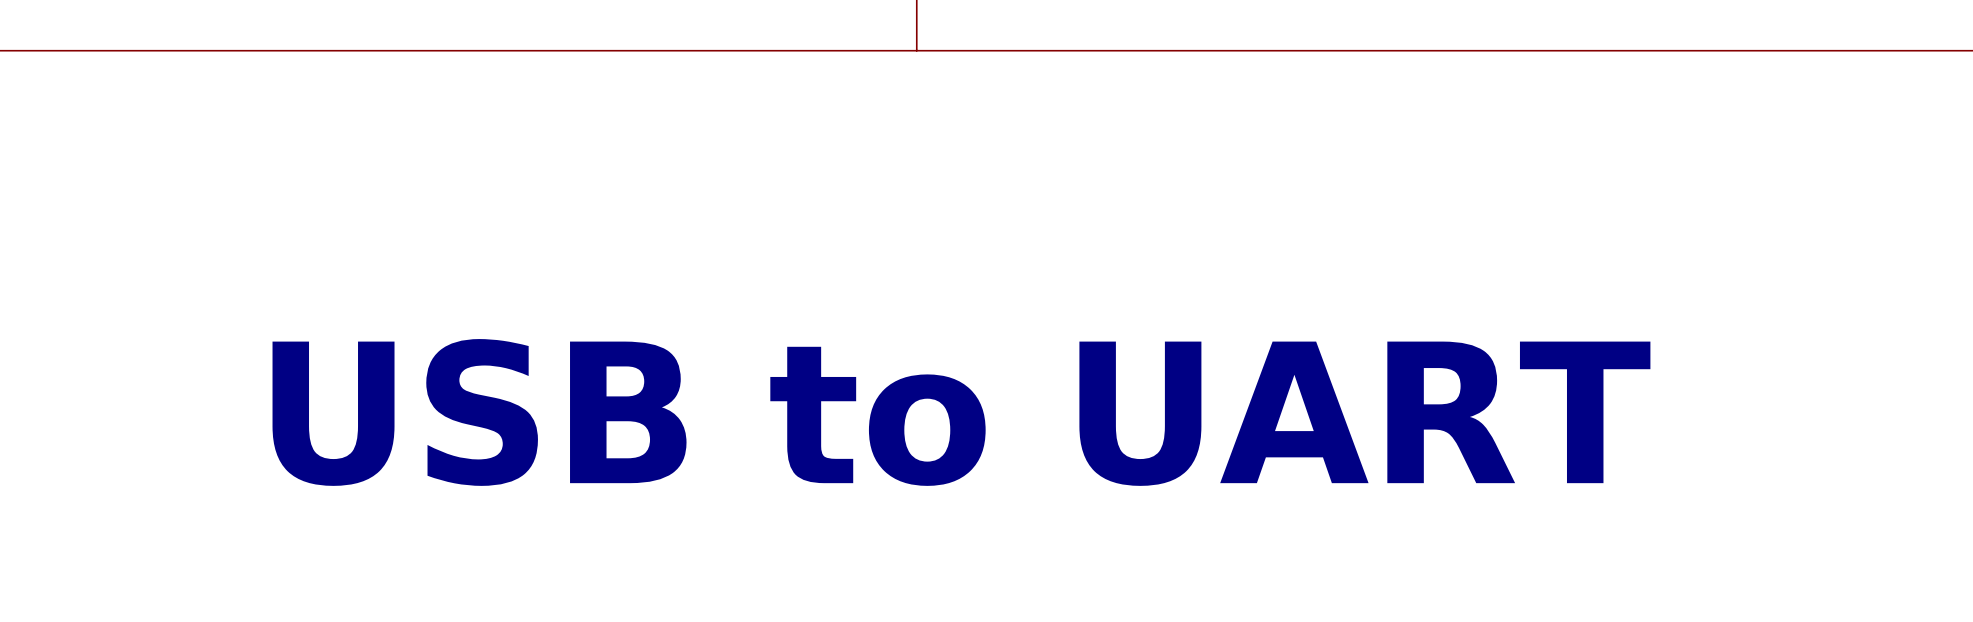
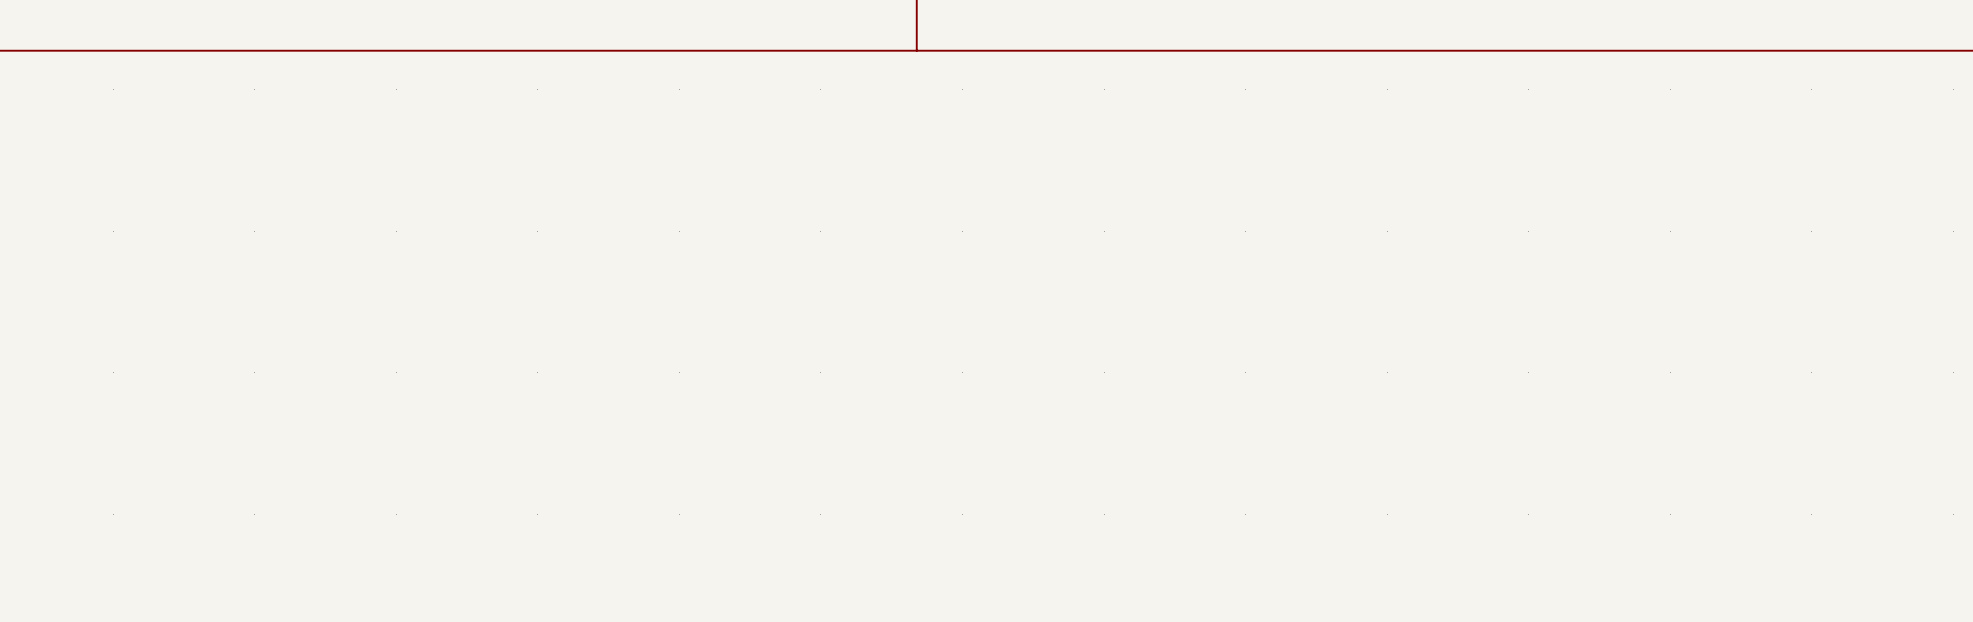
text: USB to UART (961, 412) -> none

